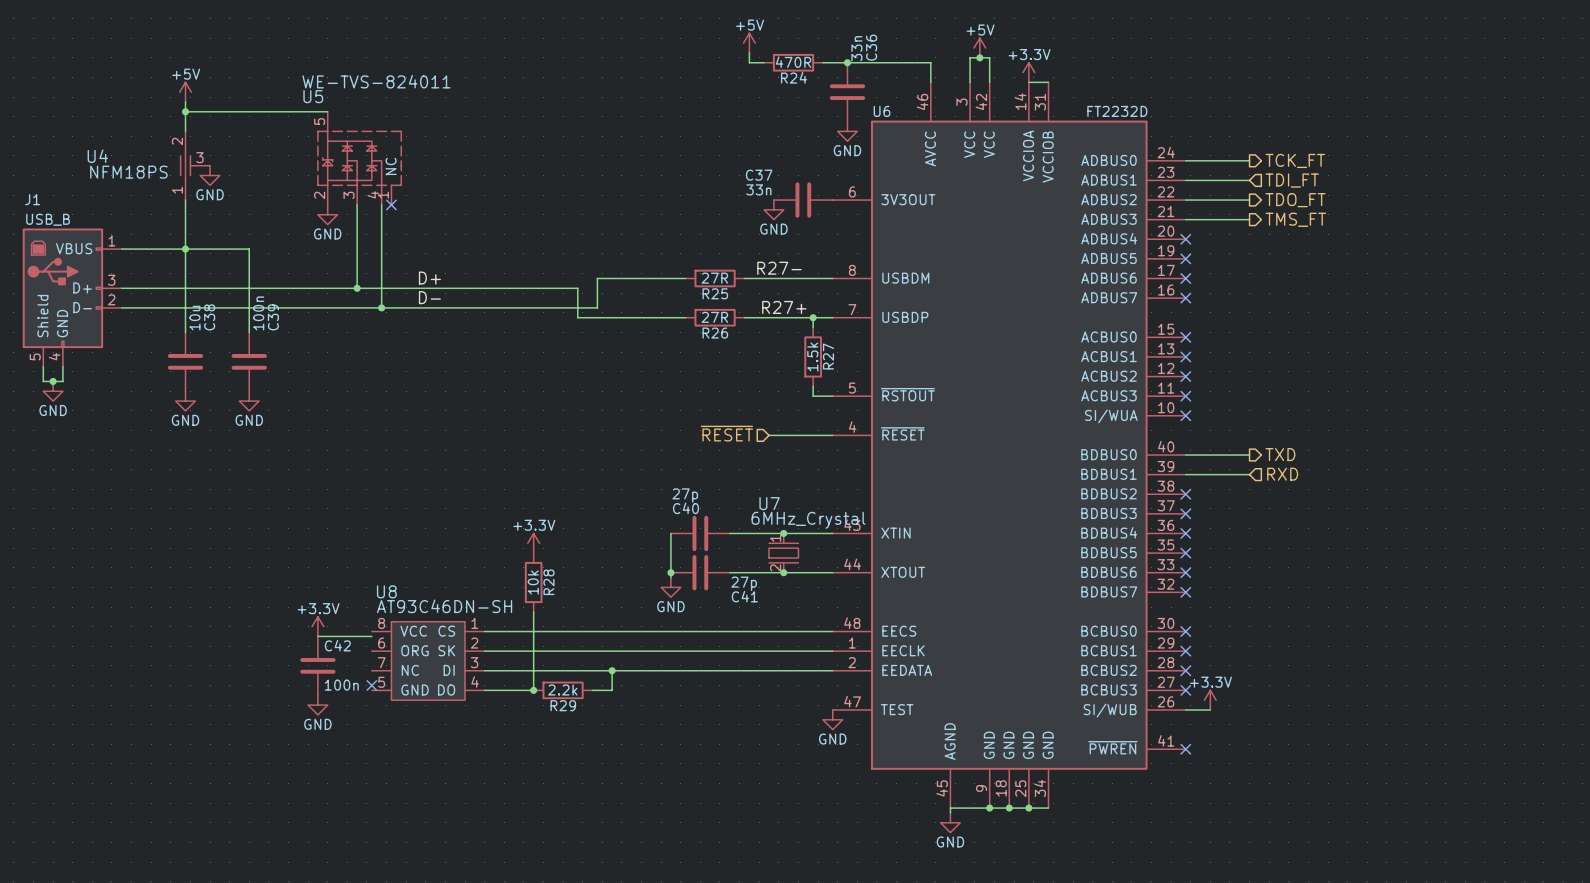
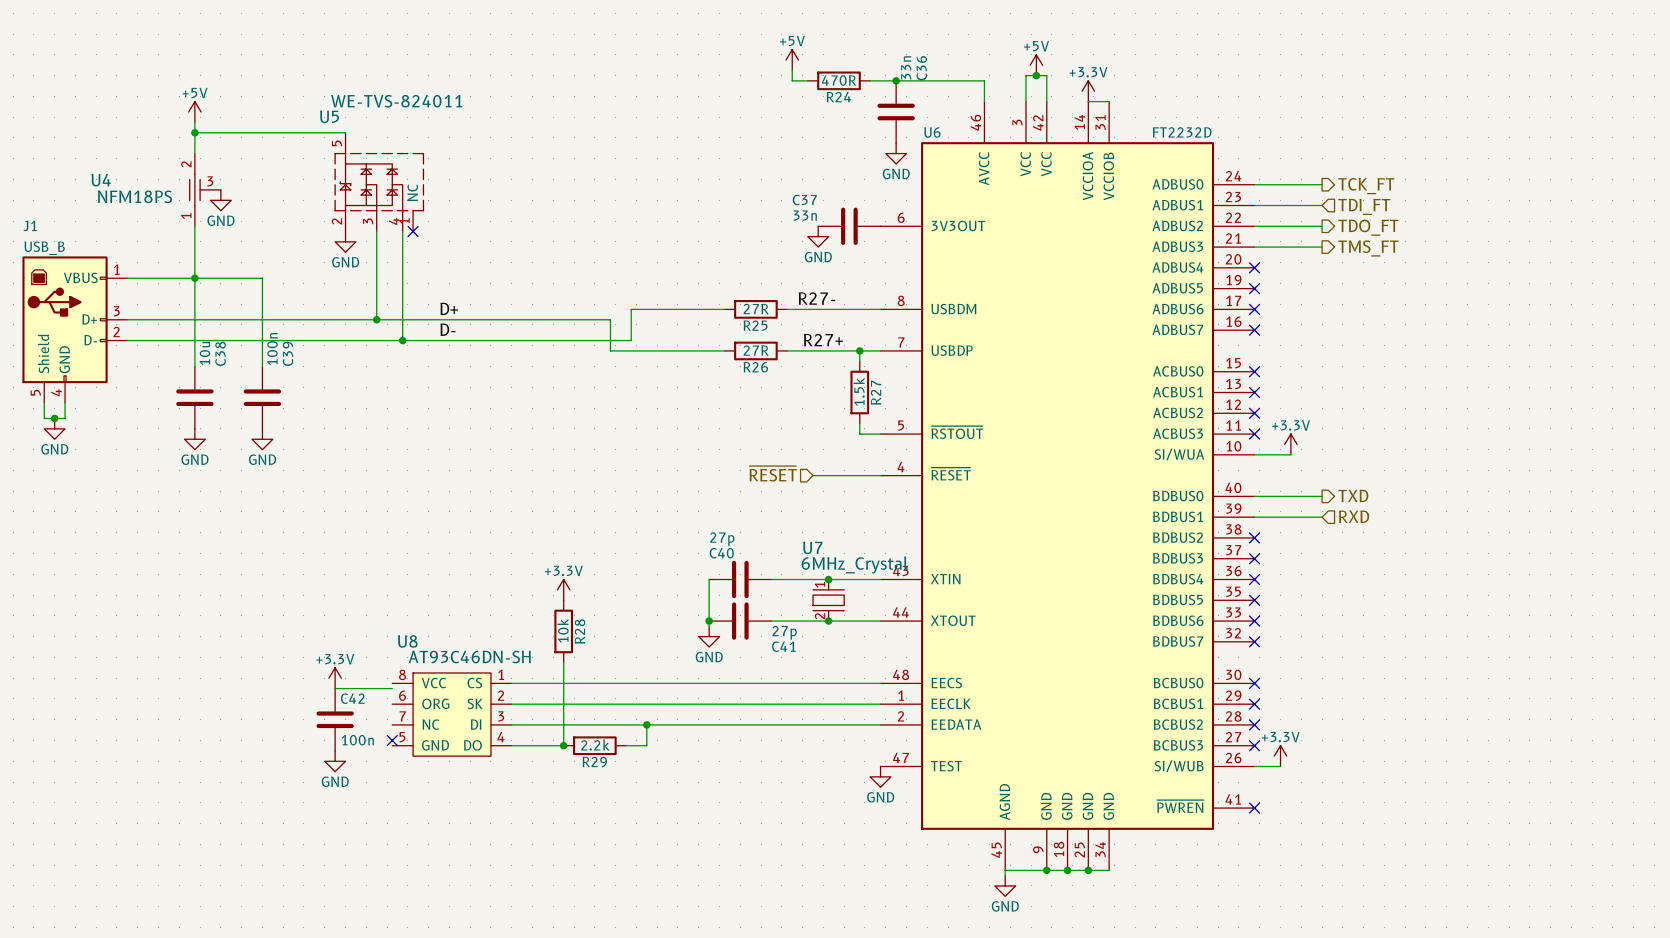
power symbol: none -> +3.3V (1290, 444)
wire: none -> (1254, 454) (1290, 454)
no-connect mark: (1185, 415) -> none

